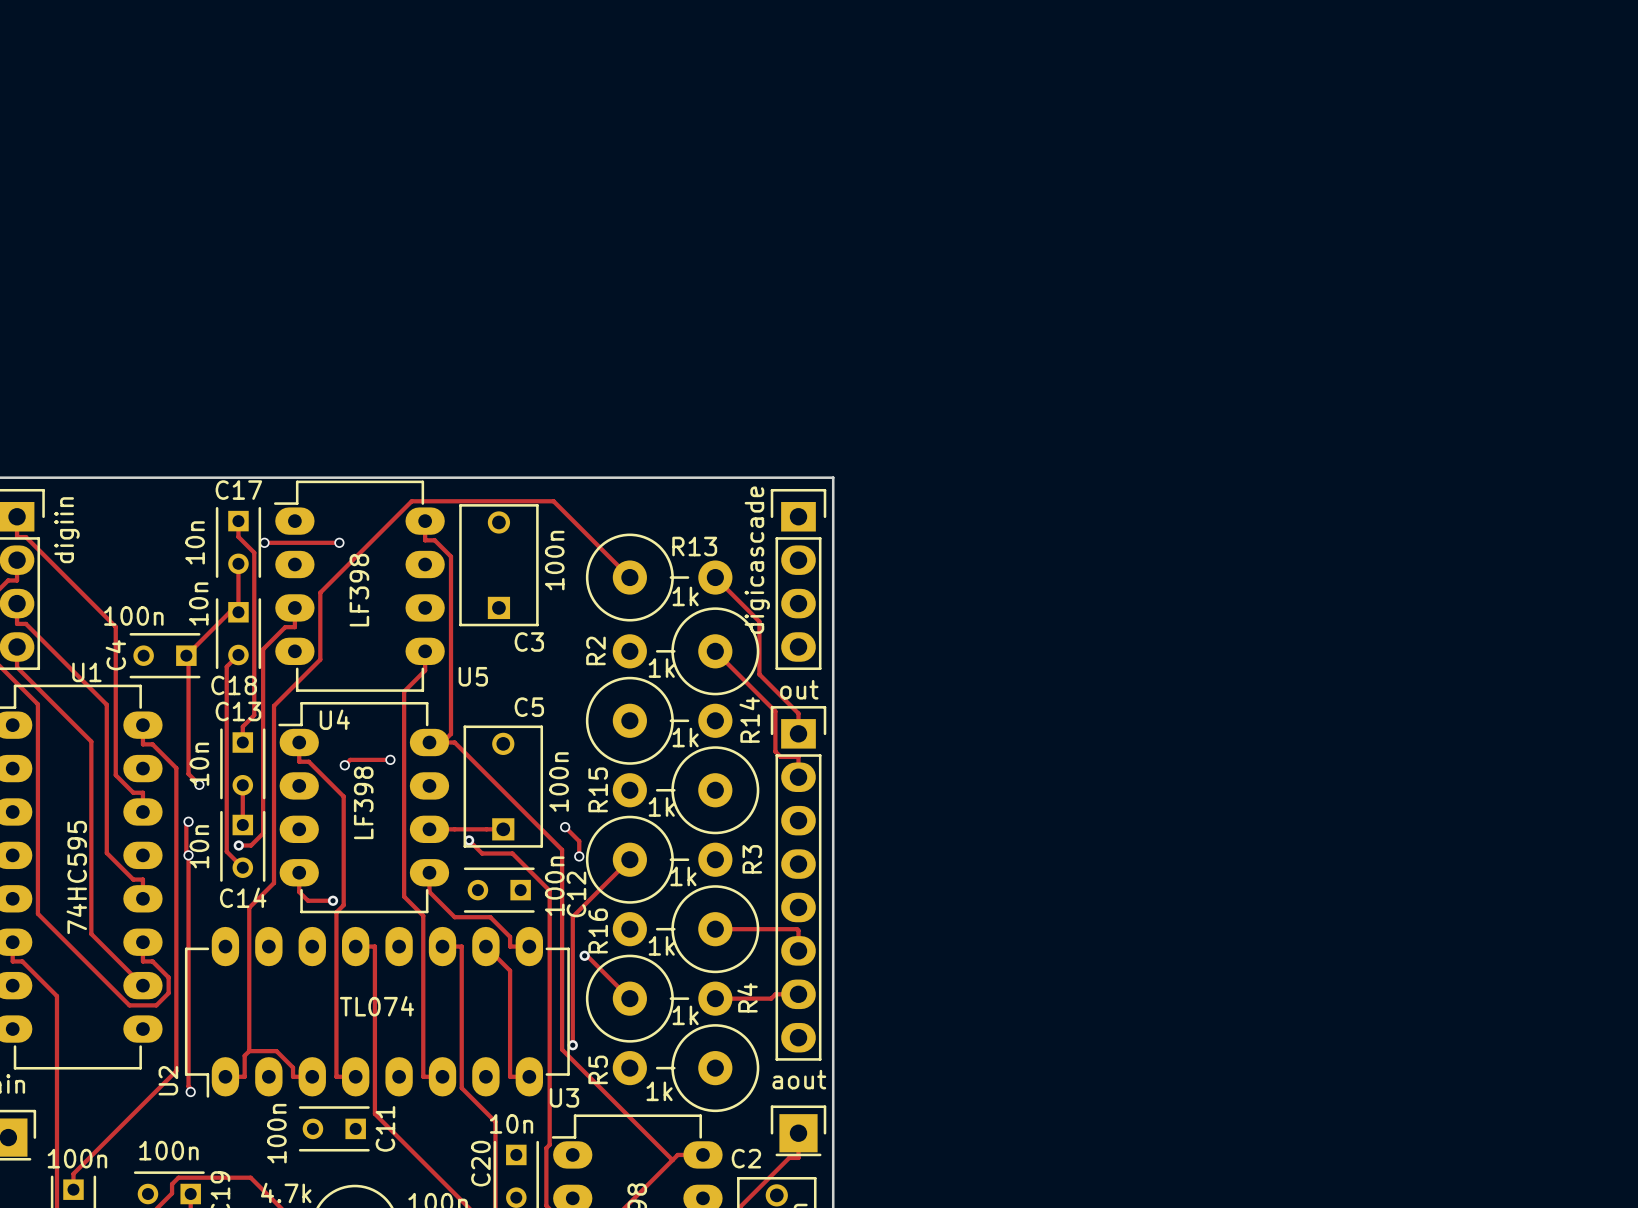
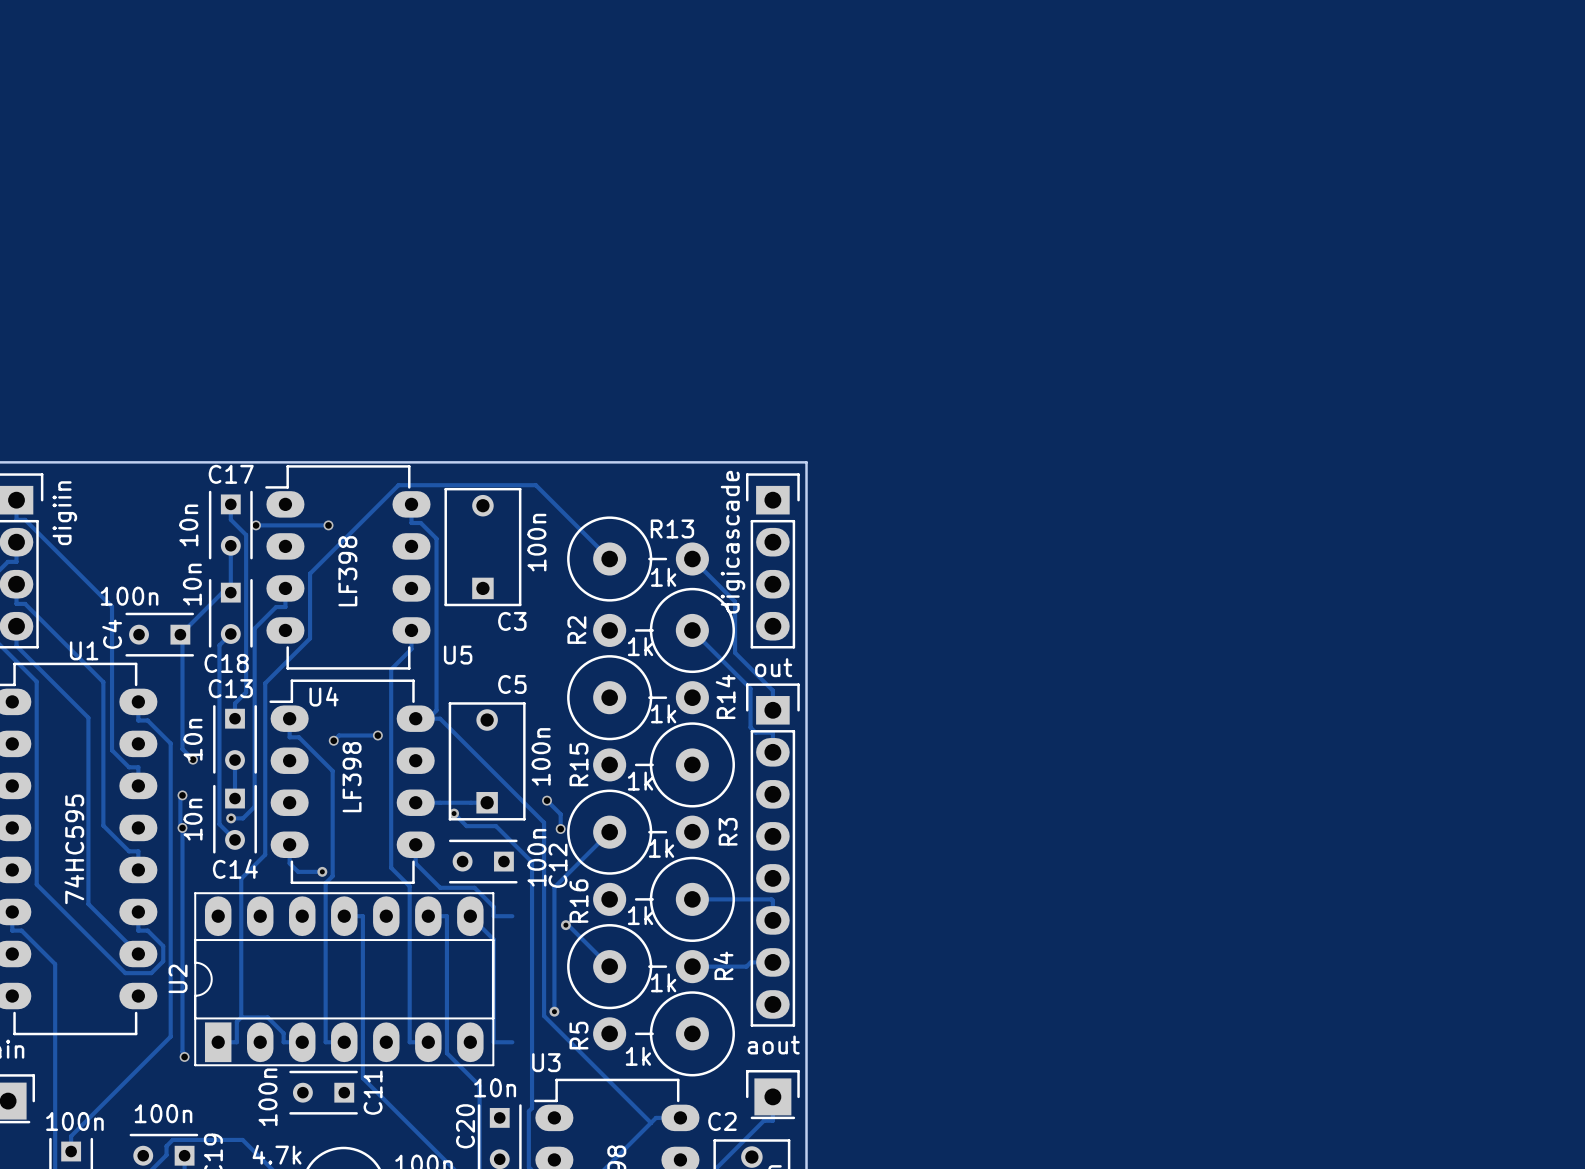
U2 footprint: [184, 926, 570, 1098] -> [194, 892, 495, 1067]
U2 value: TL074 (376, 1006) -> none
U2 name position: U2 (168, 1080) -> U2 (178, 978)

